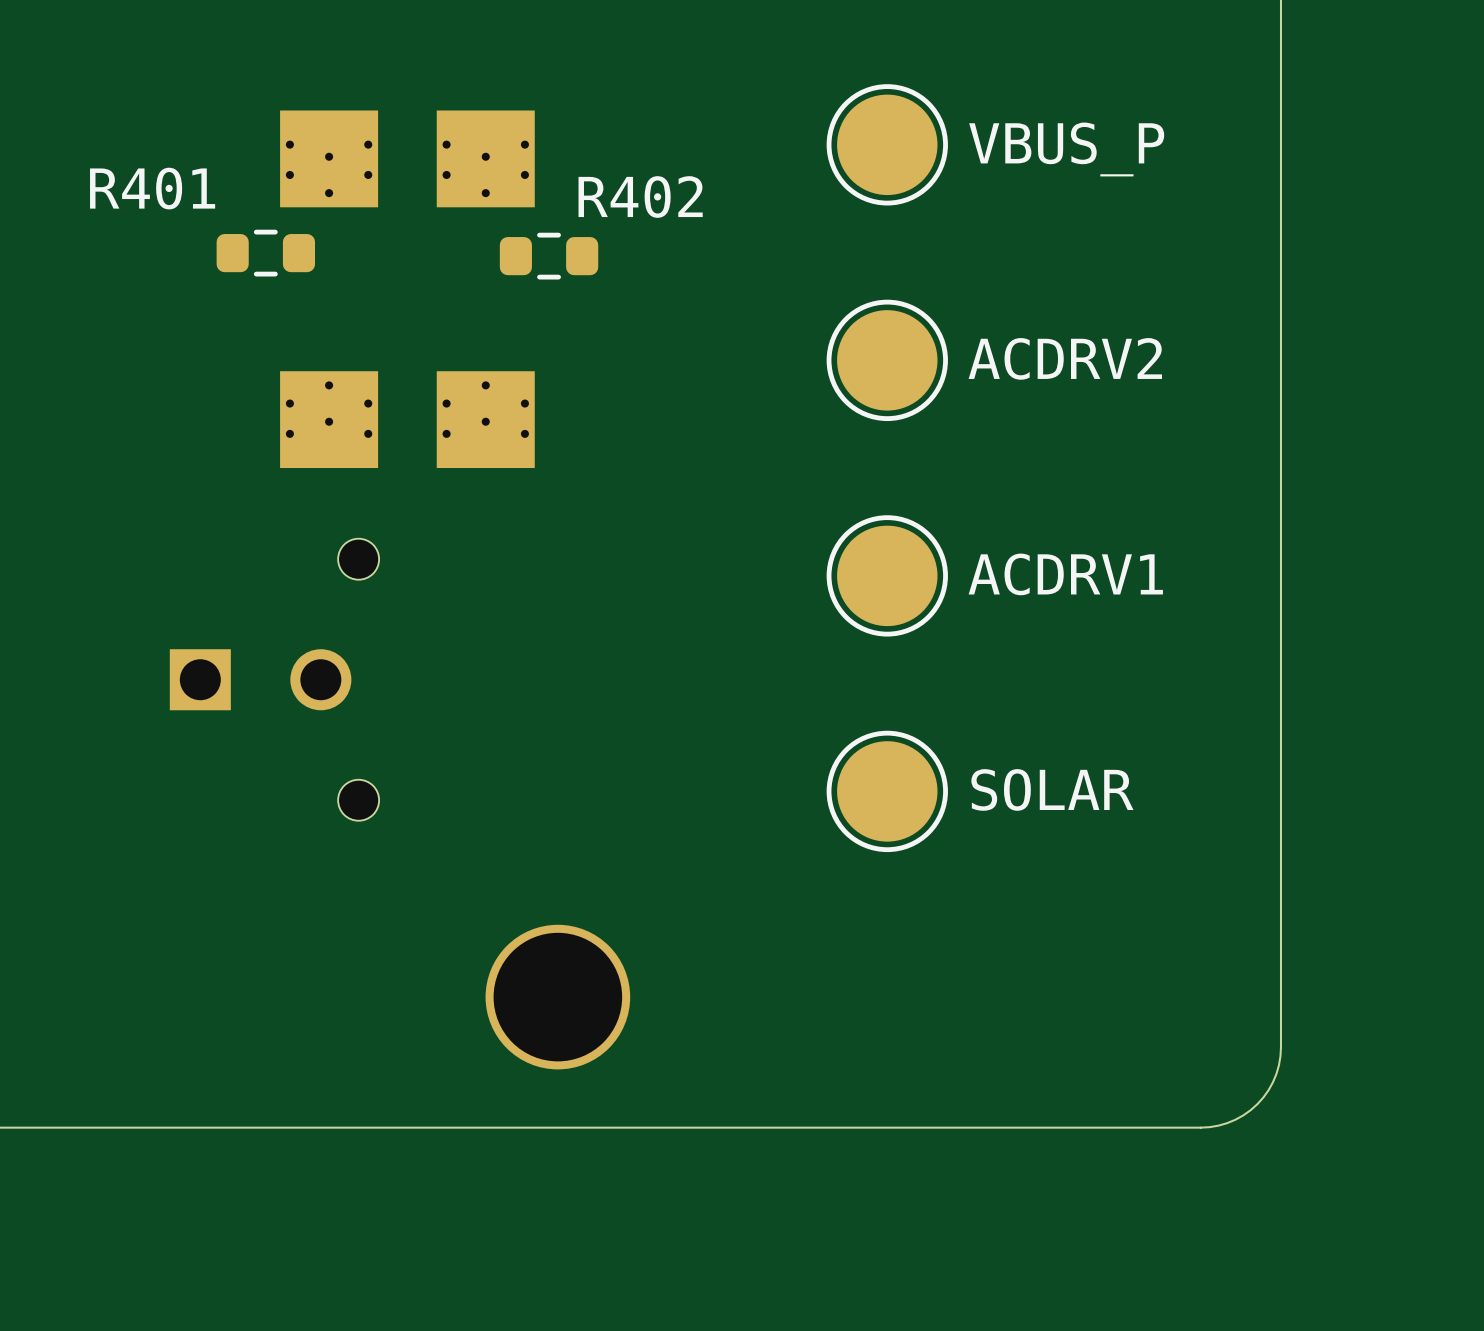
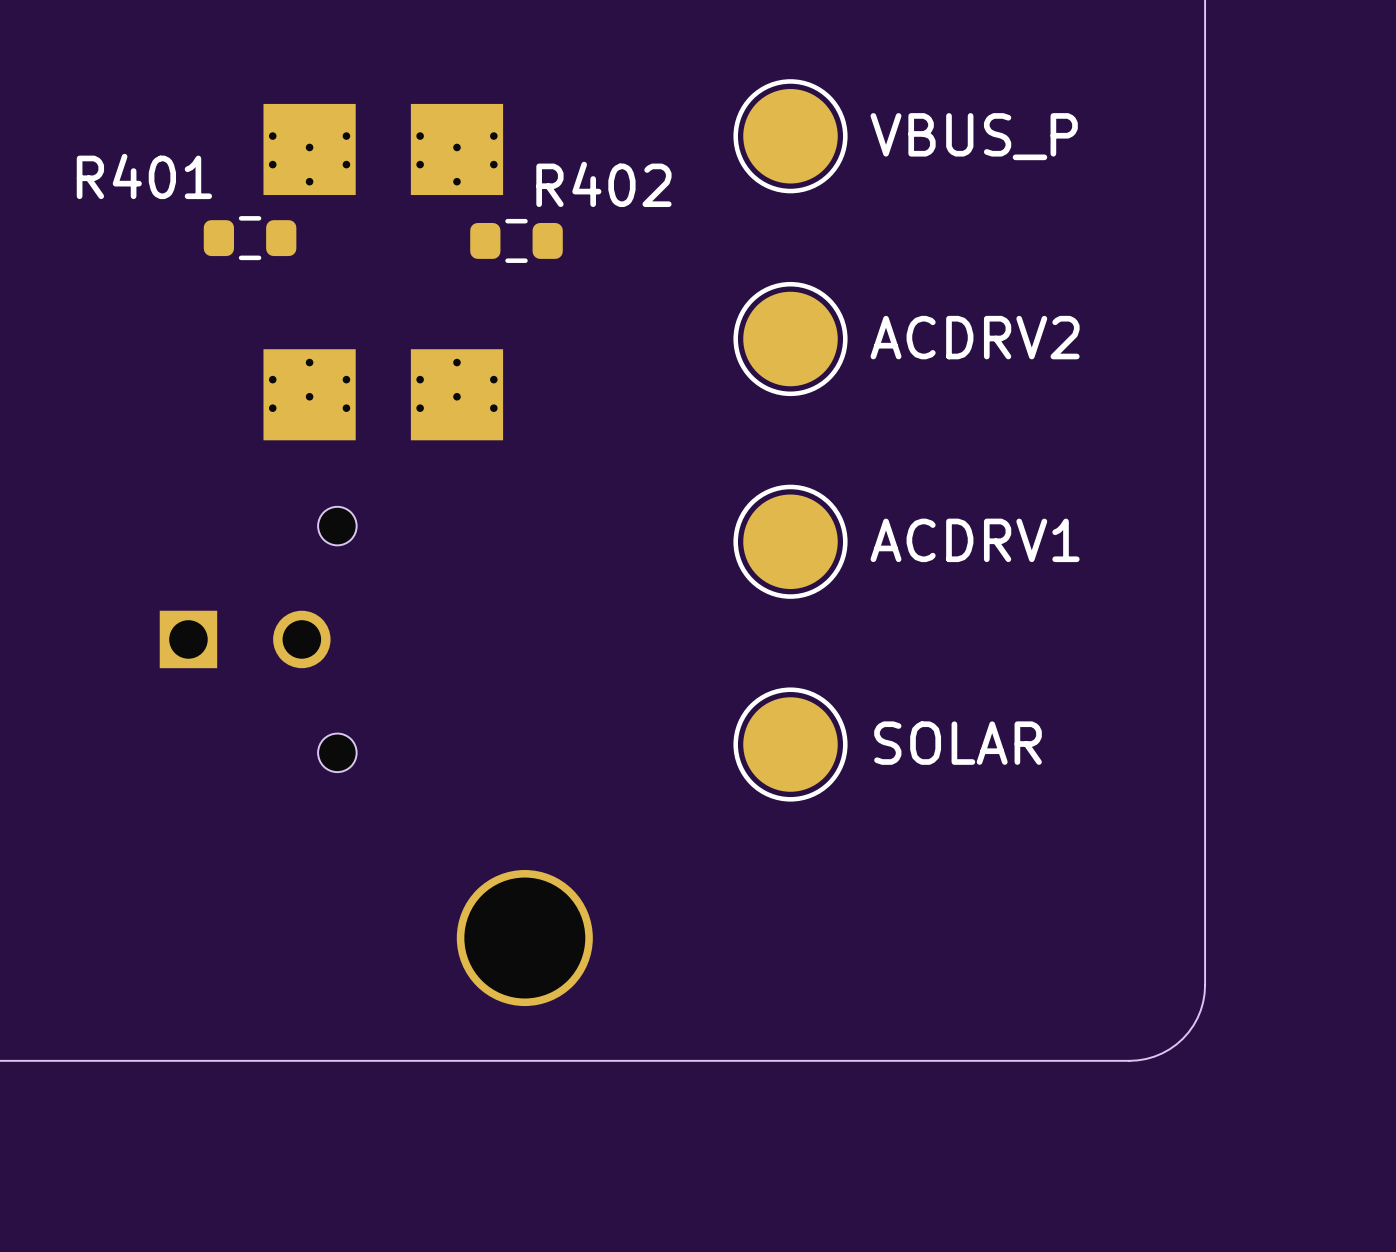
part position: (887, 144) -> (790, 136)
part position: (887, 360) -> (790, 339)
part position: (887, 575) -> (790, 541)
part position: (887, 791) -> (790, 744)

